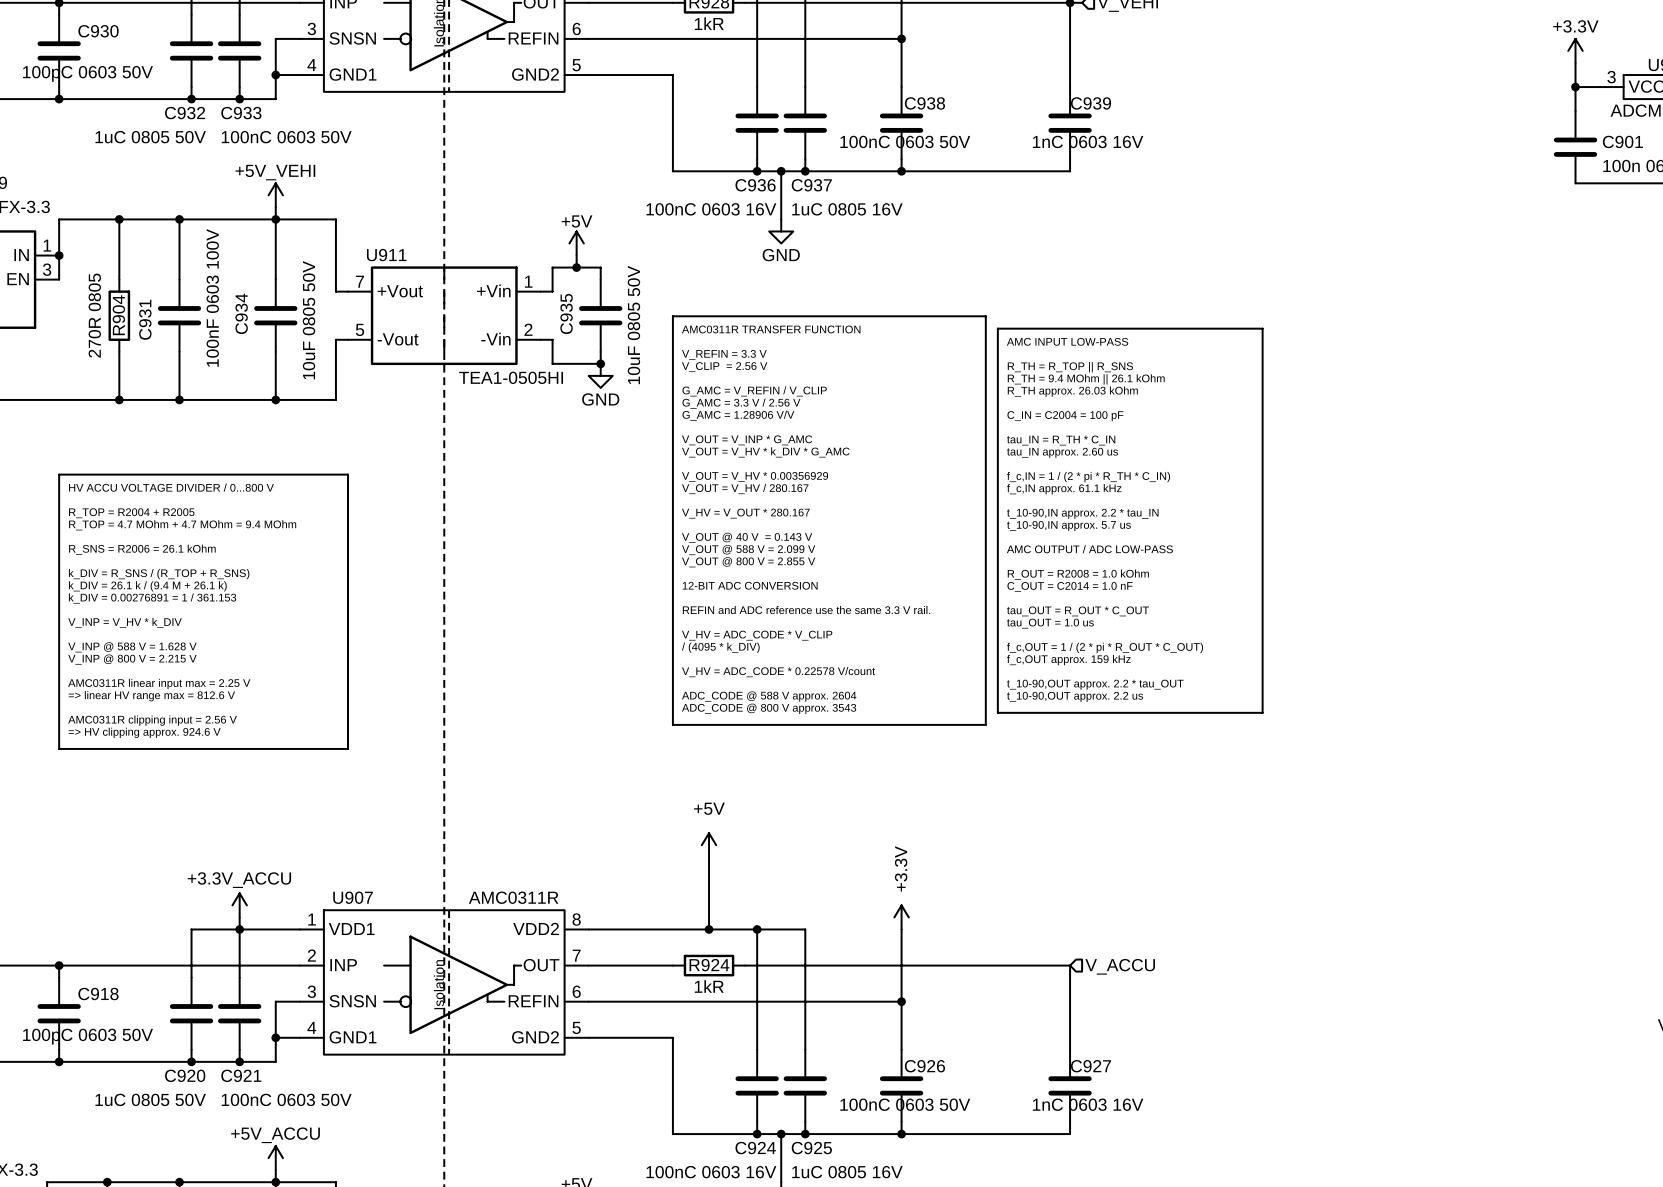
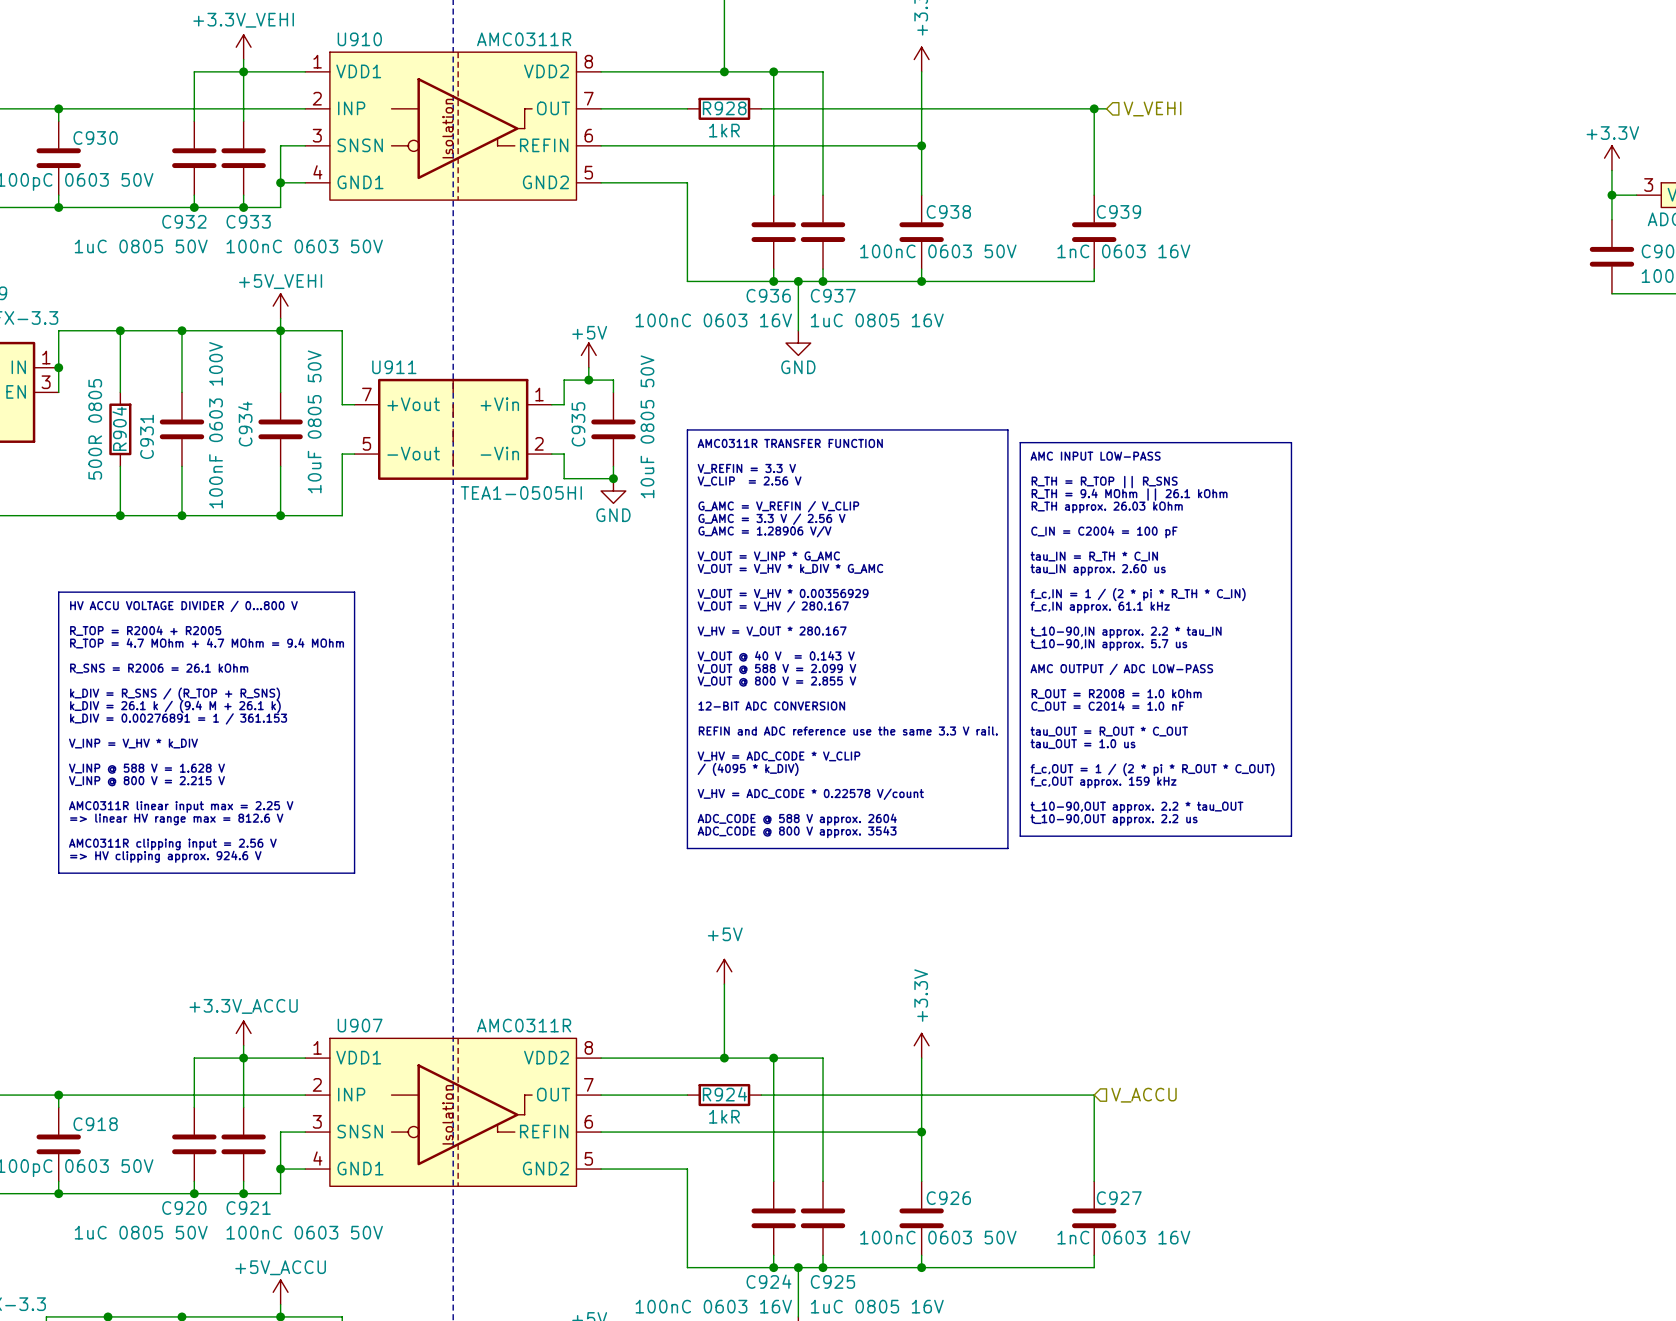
R904 value: 270R 0805 (94, 315) -> 500R 0805 (95, 429)

